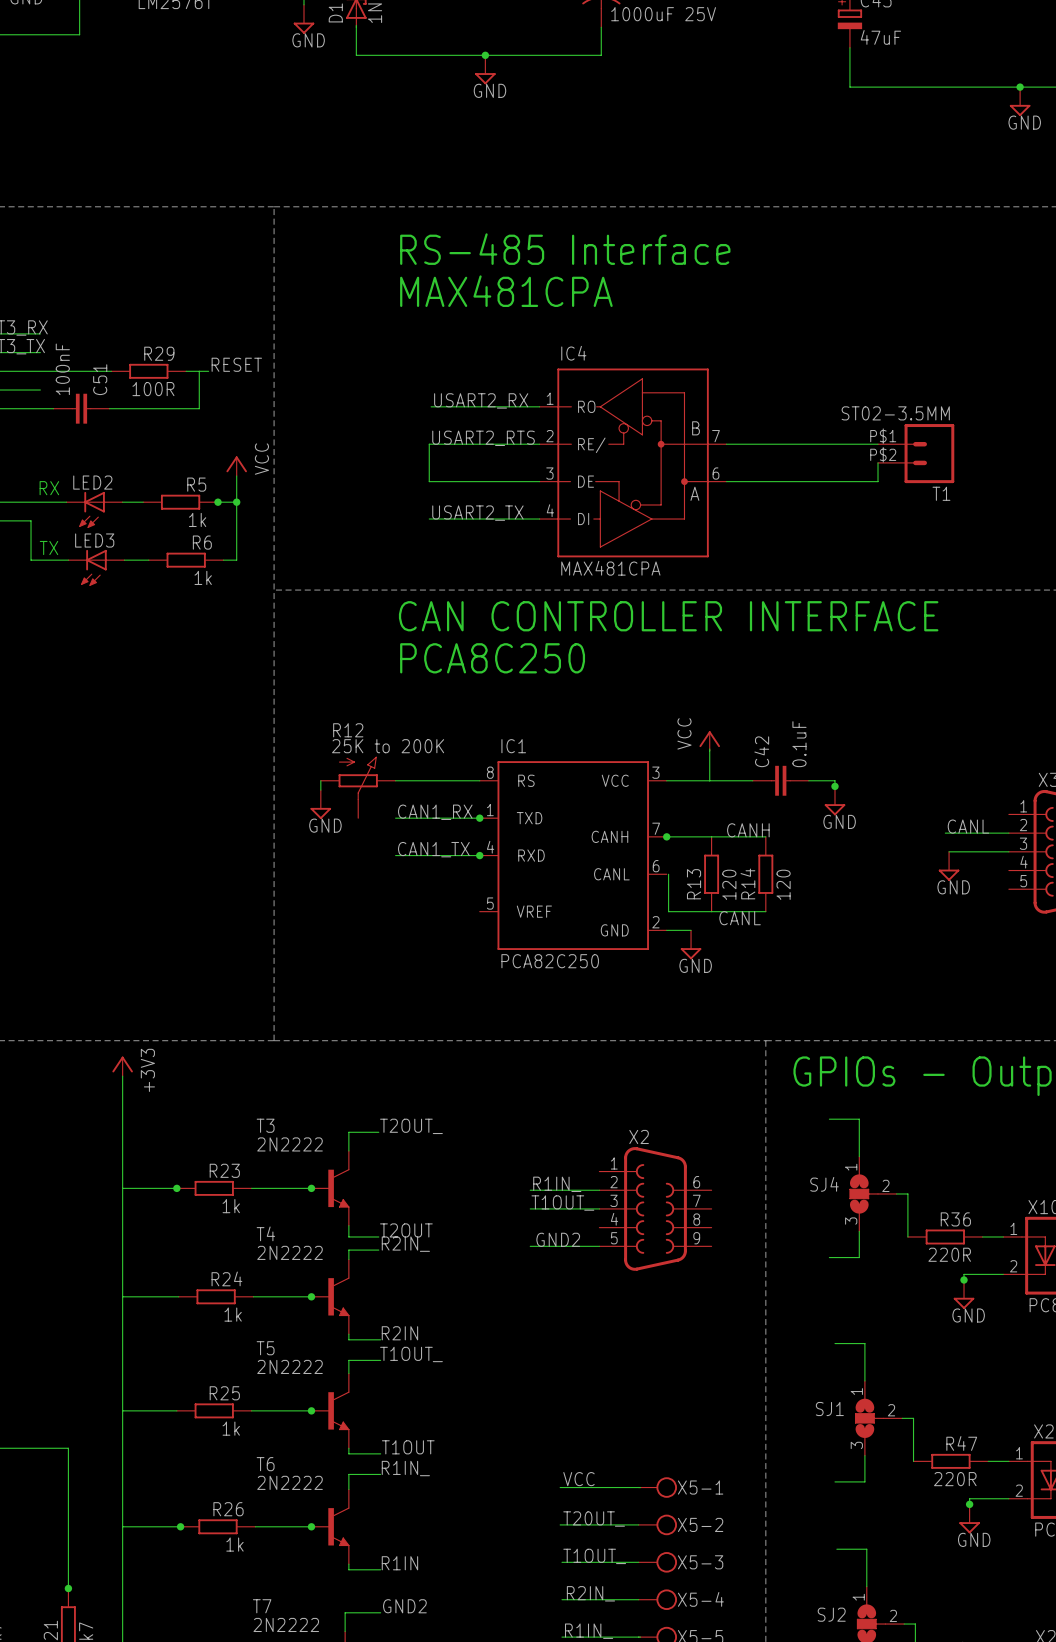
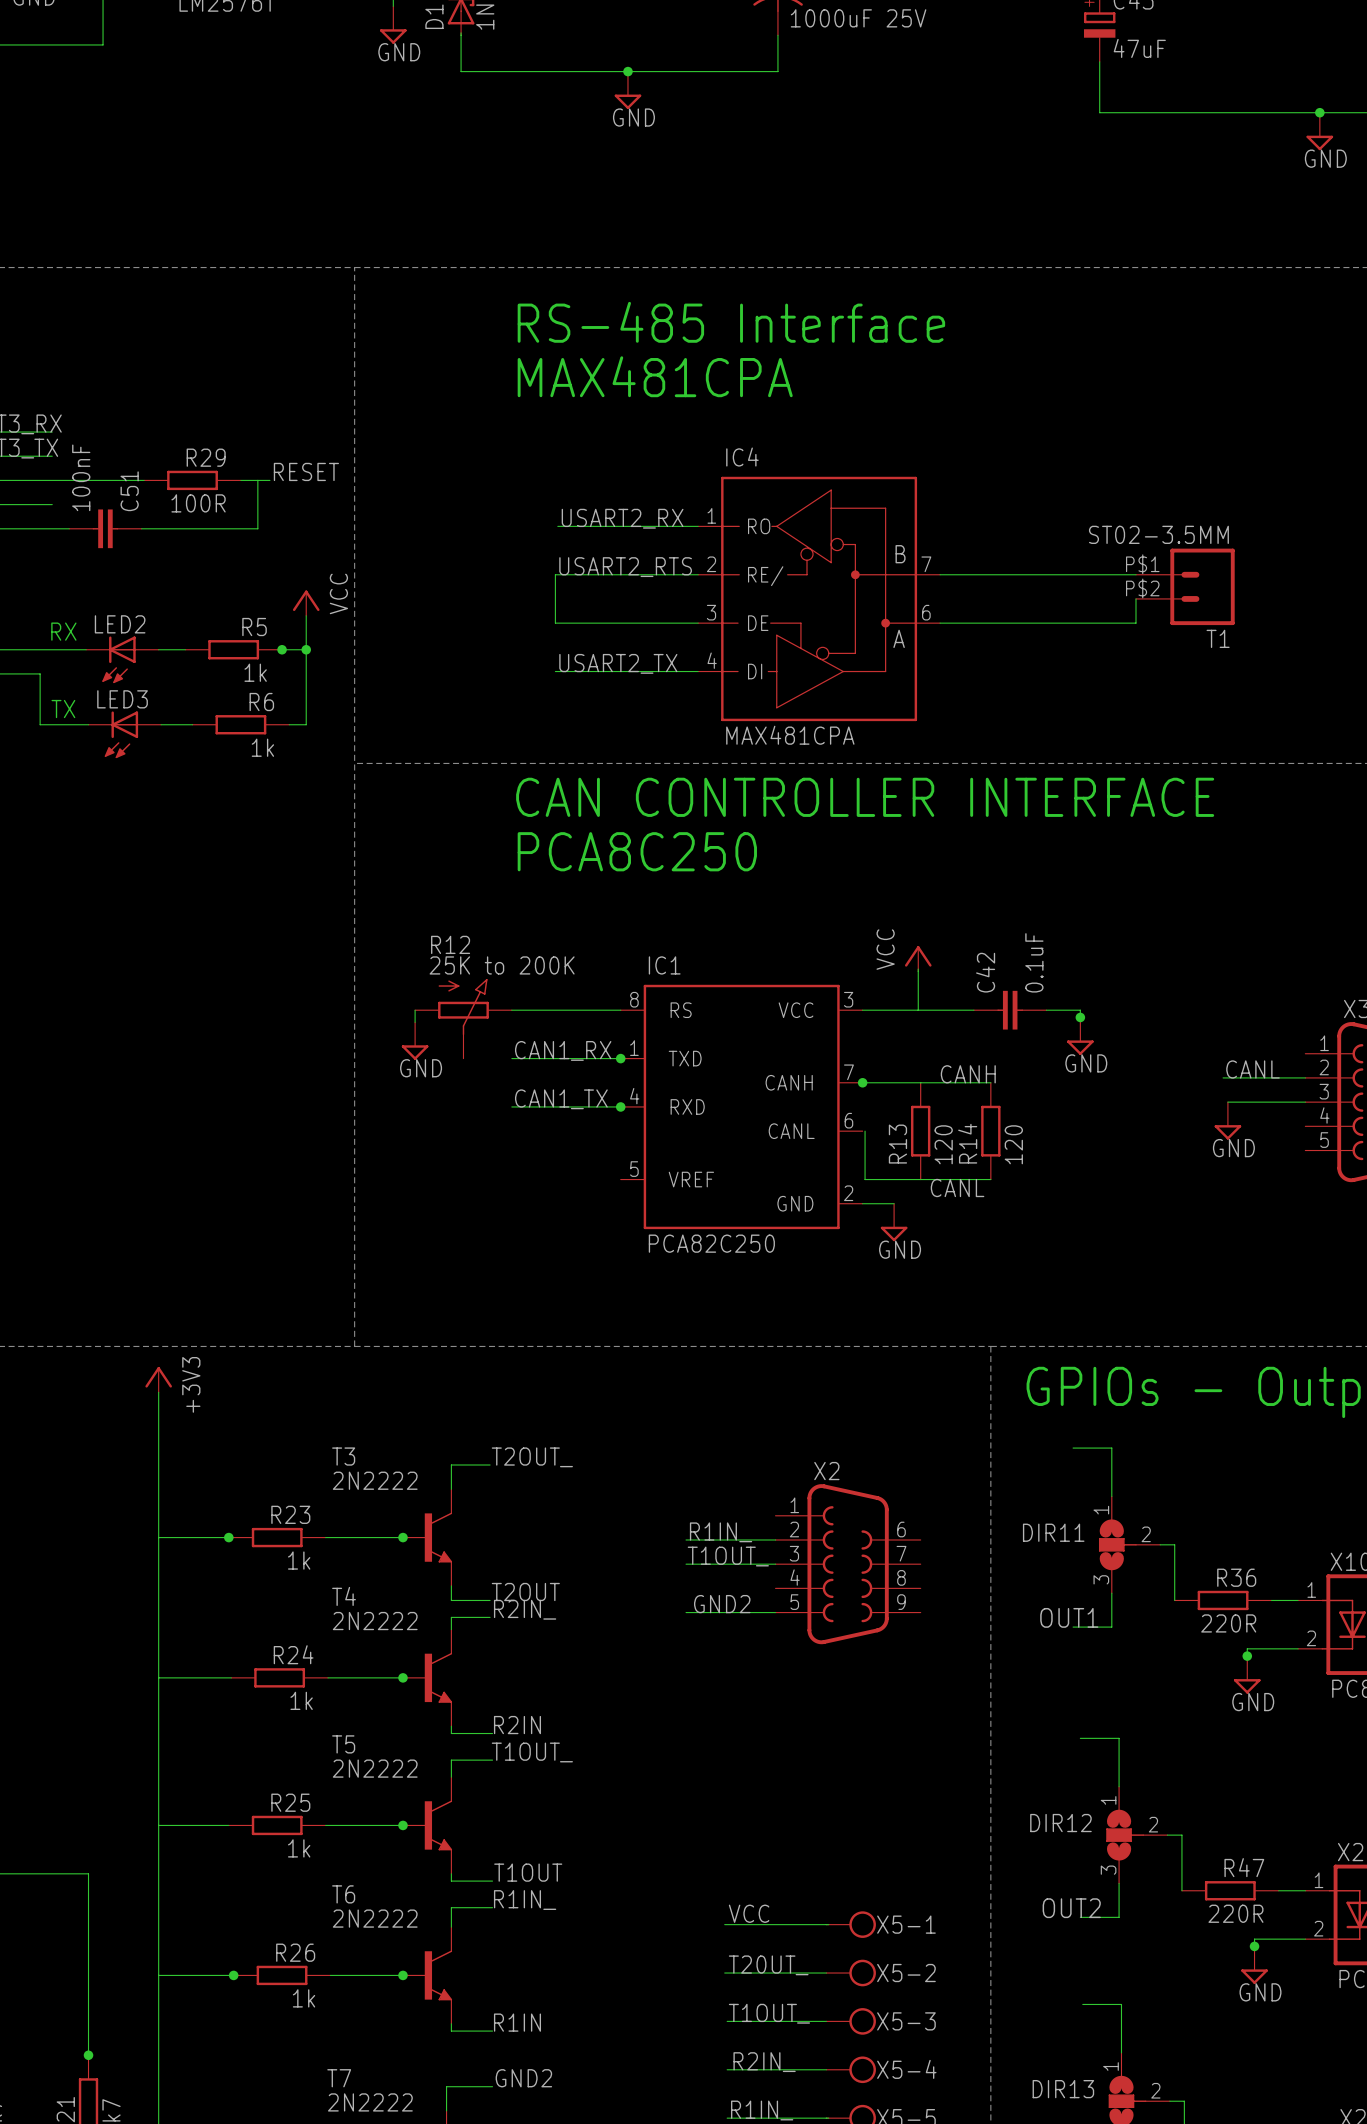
SJ4 name: SJ4 (824, 1184) -> DIR11 (1053, 1532)
label: none -> OUT1 (1069, 1617)
SJ1 name: SJ1 (829, 1409) -> DIR12 (1060, 1823)
label: none -> OUT2 (1071, 1908)
SJ2 name: SJ2 (831, 1614) -> DIR13 (1063, 2089)

